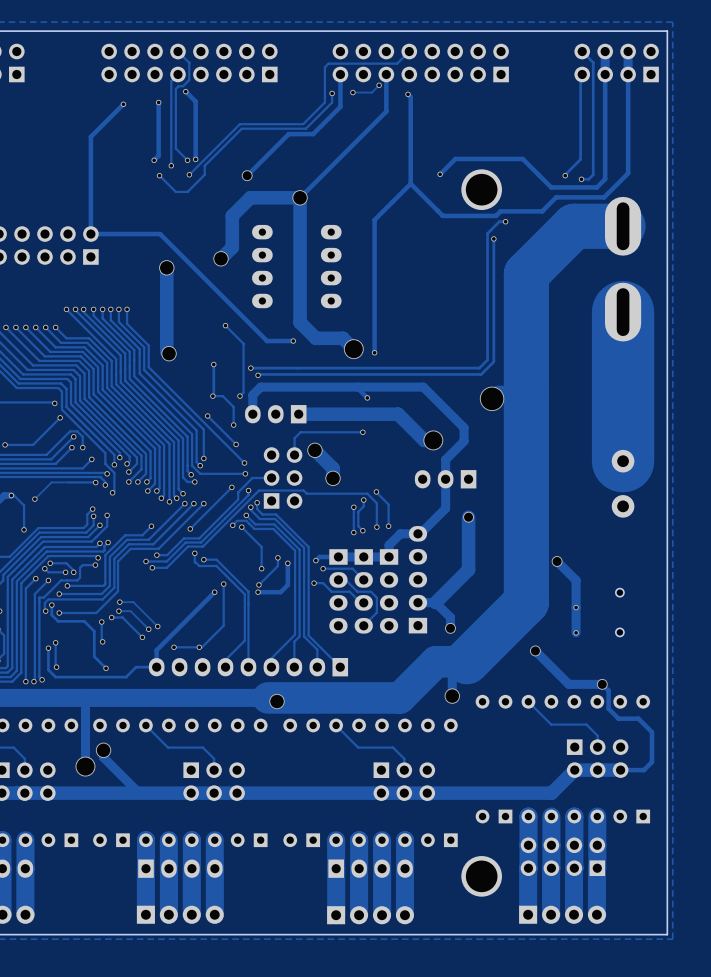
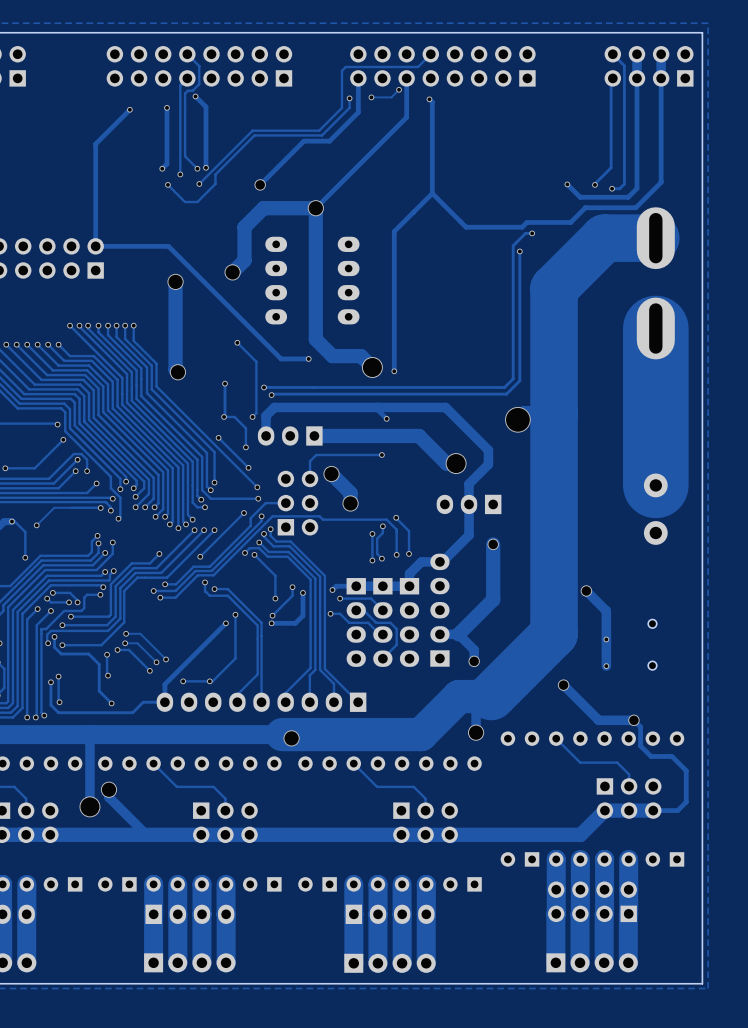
track: (440, 174) (455, 158) (522, 158) (539, 175) -> none
via: (440, 174) -> none
via: none -> (567, 184)
part: (481, 189) -> none
part: (481, 876) -> none

